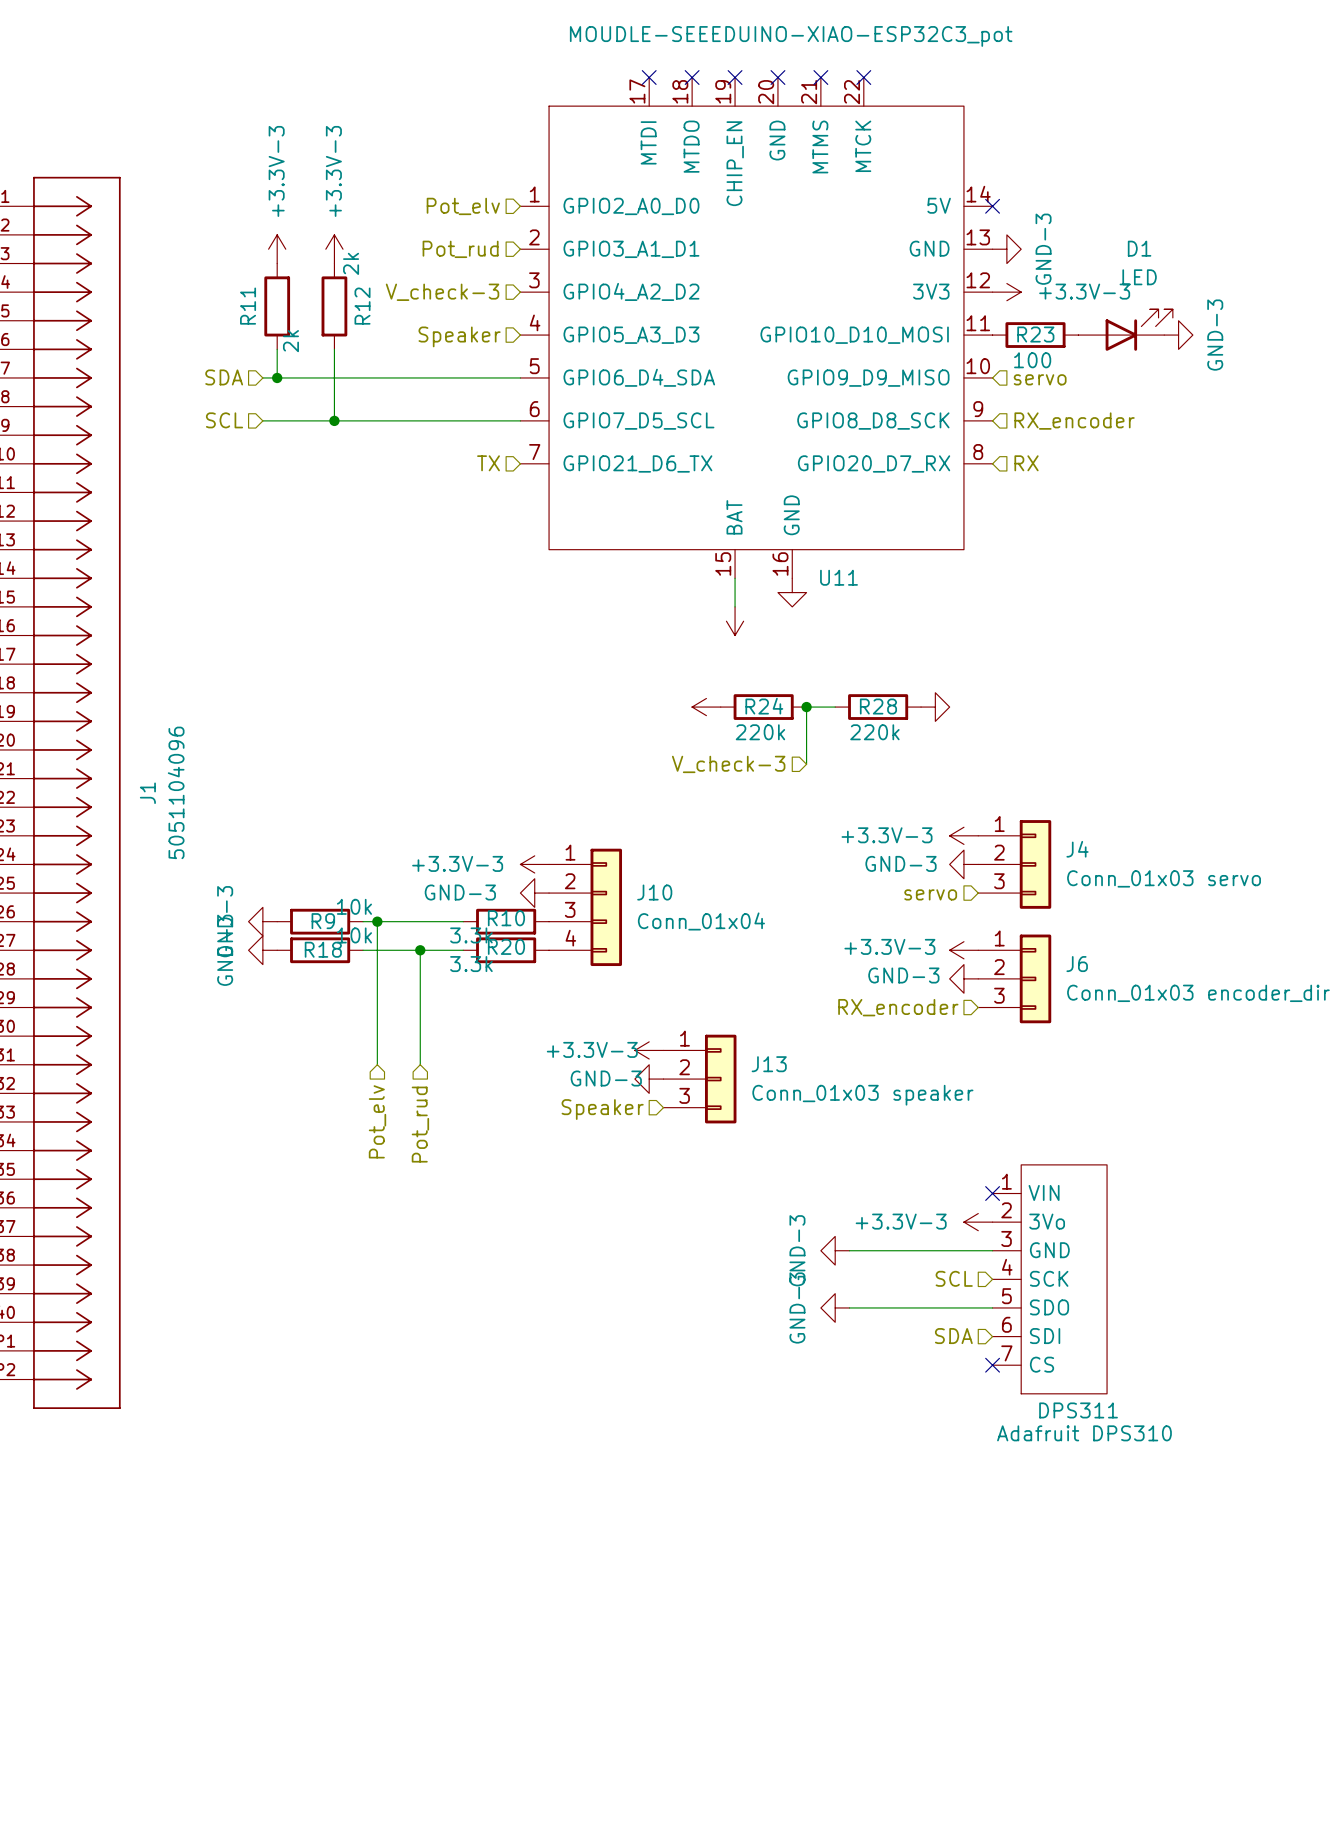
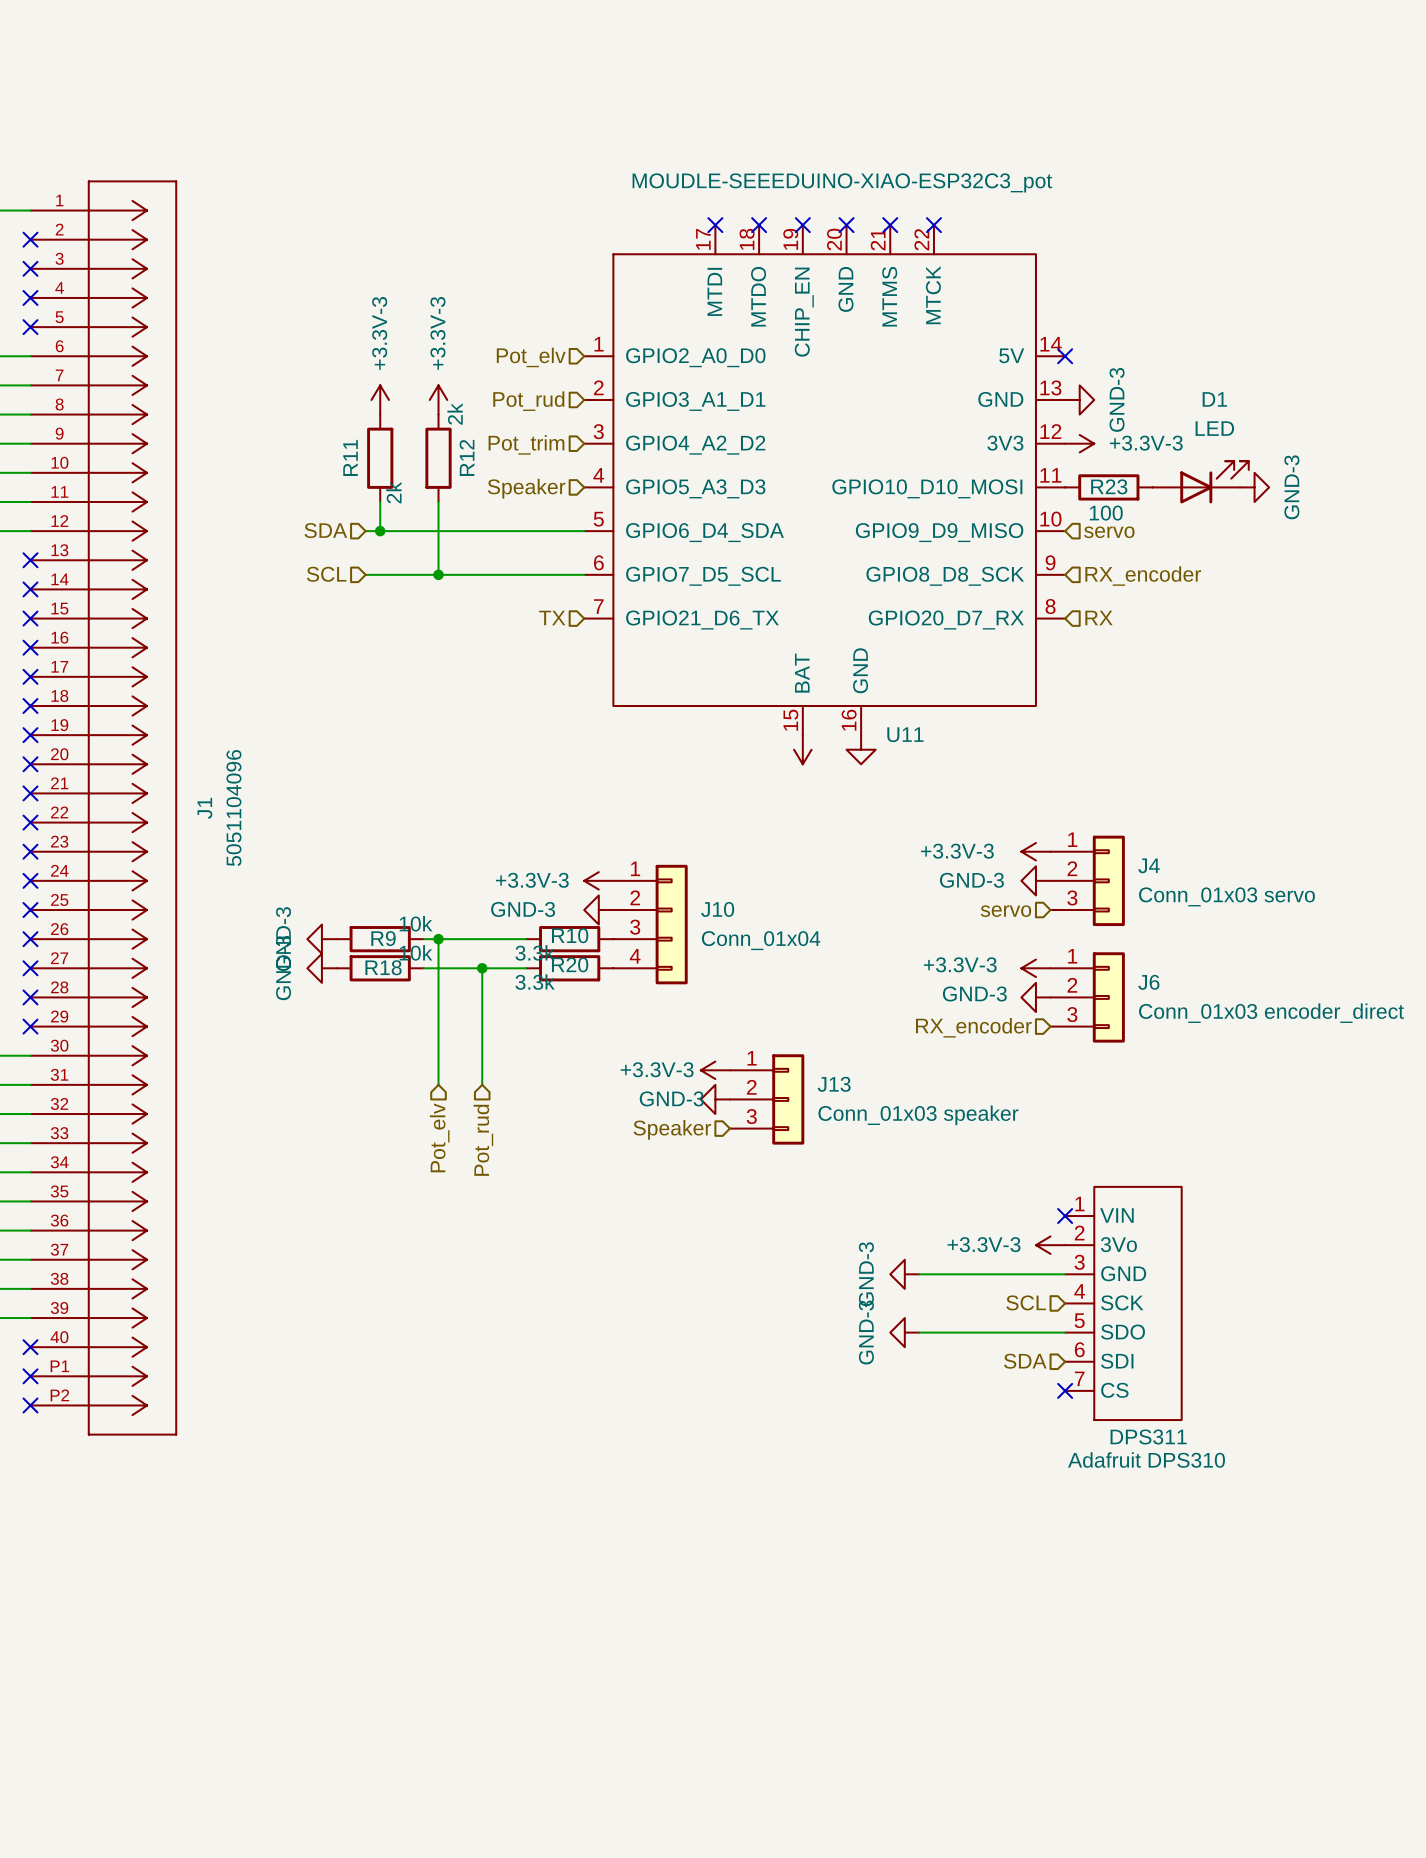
no-connect mark: (649, 77) -> none
no-connect mark: (692, 77) -> none
no-connect mark: (735, 77) -> none
no-connect mark: (777, 77) -> none
no-connect mark: (820, 77) -> none
no-connect mark: (863, 77) -> none
hierarchical label position: Pot_elv (463, 206) -> Pot_elv (531, 357)
no-connect mark: (992, 206) -> none
no-connect mark: none -> (715, 225)
no-connect mark: none -> (759, 225)
no-connect mark: none -> (802, 225)
no-connect mark: none -> (846, 225)
no-connect mark: none -> (890, 225)
no-connect mark: none -> (933, 225)
power symbol: +3.3V-3 (277, 249) -> none
power symbol: +3.3V-3 (334, 249) -> none
hierarchical label position: Pot_rud (460, 249) -> Pot_rud (528, 401)
power symbol: GND-3 (1006, 249) -> none
hierarchical label: V_check-3 (442, 292) -> none
power symbol position: +3.3V-3 (1006, 292) -> +3.3V-3 (1079, 443)
R11 position: (277, 306) -> (380, 458)
R12 position: (334, 306) -> (438, 458)
U11 position: (756, 327) -> (824, 480)
D1 position: (1125, 330) -> (1200, 482)
R23 position: (1035, 335) -> (1108, 487)
power symbol: GND-3 (1178, 335) -> none
hierarchical label position: Speaker (459, 336) -> Speaker (526, 488)
wire: (277, 349) (277, 377) -> (380, 501) (380, 531)
wire: (334, 349) (334, 420) -> (438, 501) (438, 574)
no-connect mark: none -> (1065, 356)
hierarchical label position: SDA (224, 377) -> SDA (325, 530)
wire: (262, 377) (520, 377) -> none
junction: (277, 377) -> none
hierarchical label position: servo (1040, 379) -> servo (1109, 532)
power symbol: none -> +3.3V-3 (380, 399)
power symbol: none -> +3.3V-3 (438, 399)
power symbol: none -> GND-3 (1079, 399)
hierarchical label position: SCL (224, 420) -> SCL (326, 574)
wire: (262, 420) (520, 420) -> none
junction: (334, 420) -> none
hierarchical label position: RX_encoder (1074, 421) -> RX_encoder (1143, 576)
hierarchical label: none -> Pot_trim (526, 444)
hierarchical label position: TX (488, 463) -> TX (552, 618)
hierarchical label position: RX (1026, 463) -> RX (1098, 618)
power symbol: none -> GND-3 (1254, 487)
wire: none -> (365, 531) (584, 531)
junction: none -> (380, 531)
wire: none -> (365, 574) (584, 574)
junction: none -> (438, 574)
wire: (735, 578) (735, 606) -> none
power symbol: (792, 592) -> none
power symbol: (735, 621) -> none
power symbol rotation: 0° (706, 707) -> 90° counterclockwise (802, 749)
power symbol position: (706, 707) -> (802, 749)
R24: 220k (763, 707) -> none
junction: (806, 707) -> none
wire: (835, 707) (806, 707) (806, 764) -> none
R28: 220k (878, 707) -> none
power symbol: (935, 707) -> none
power symbol: none -> (861, 749)
hierarchical label: V_check-3 (728, 764) -> none

